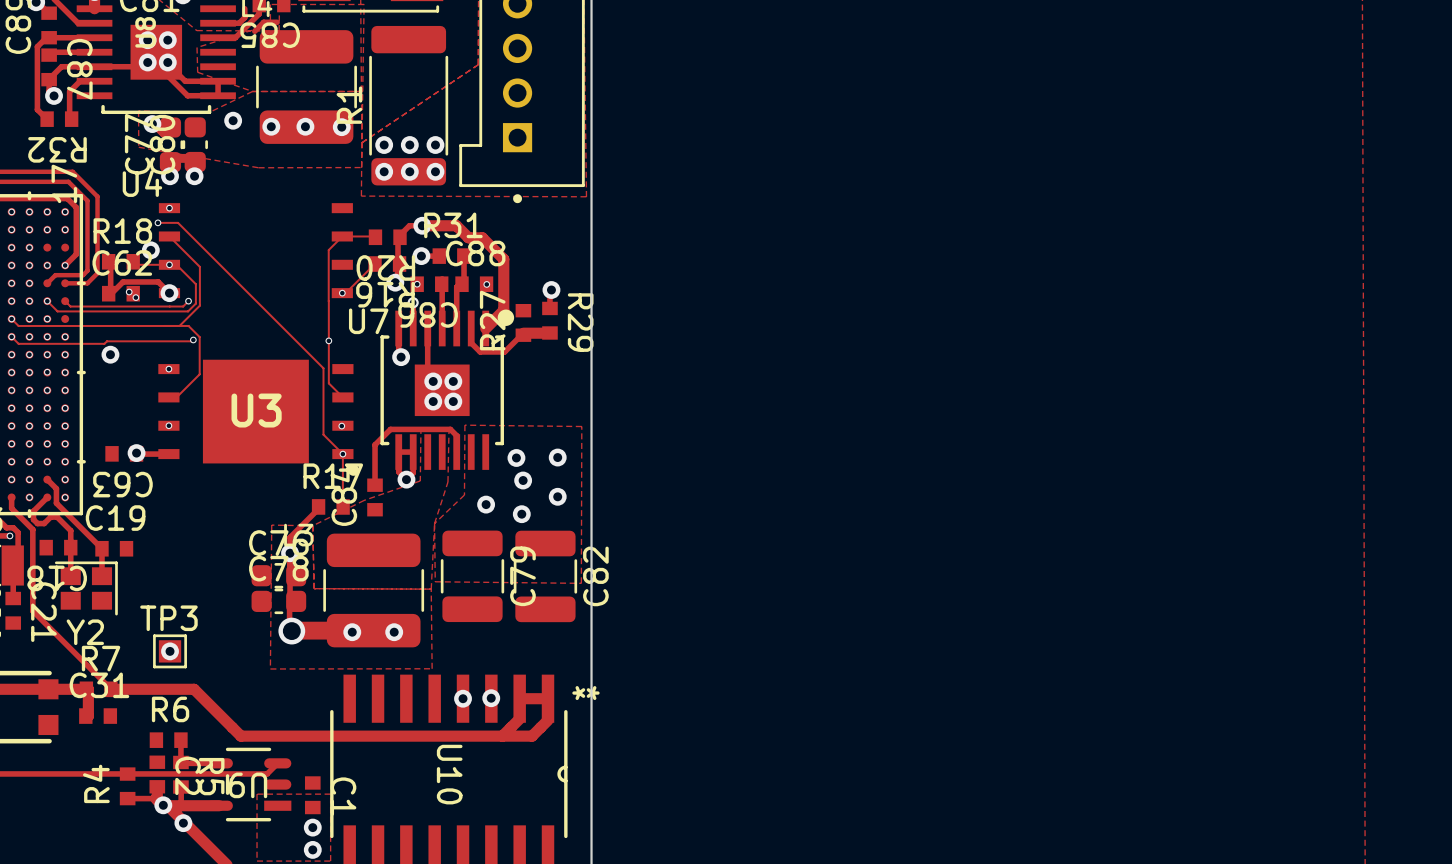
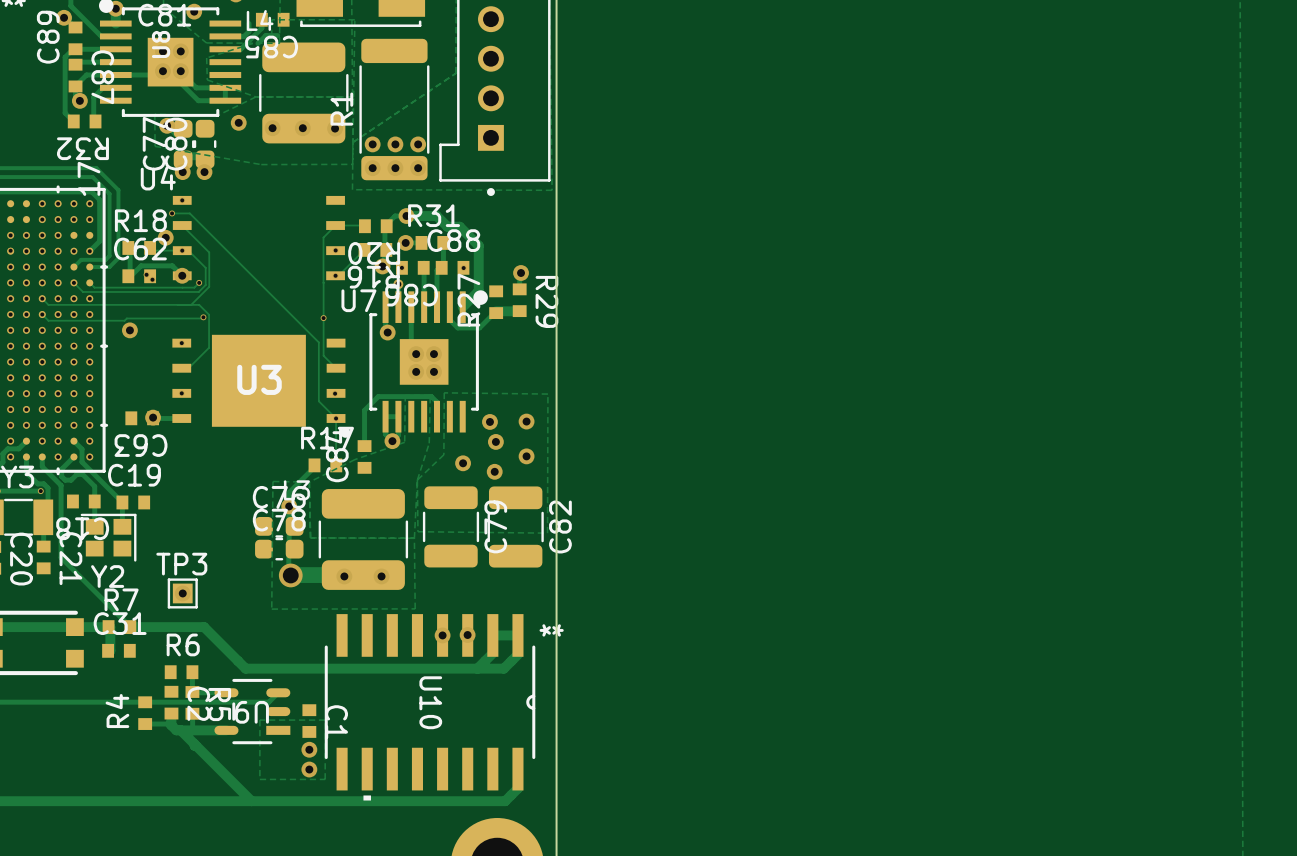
via: none -> (335, 250)
via: none -> (89, 298)
via: (163, 805) -> none
via: (183, 823) -> none

